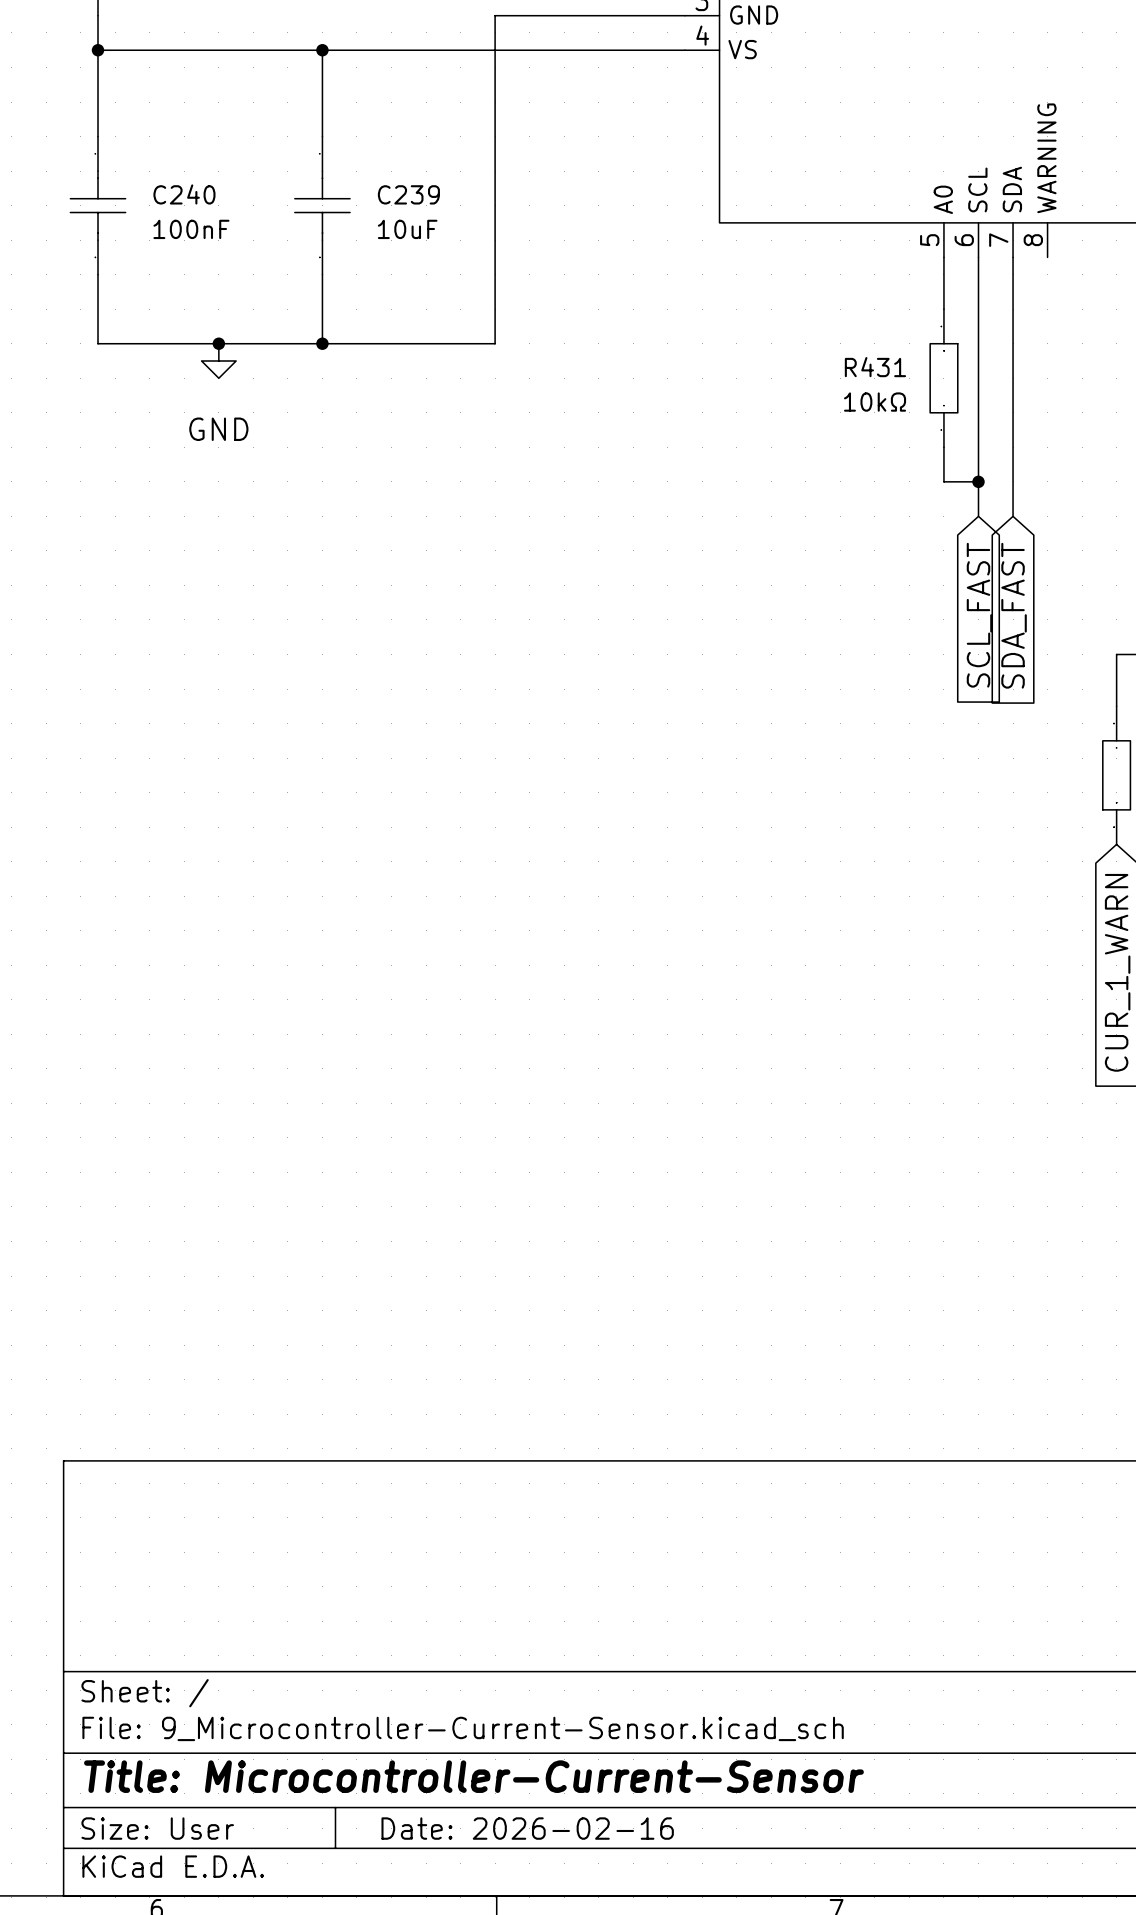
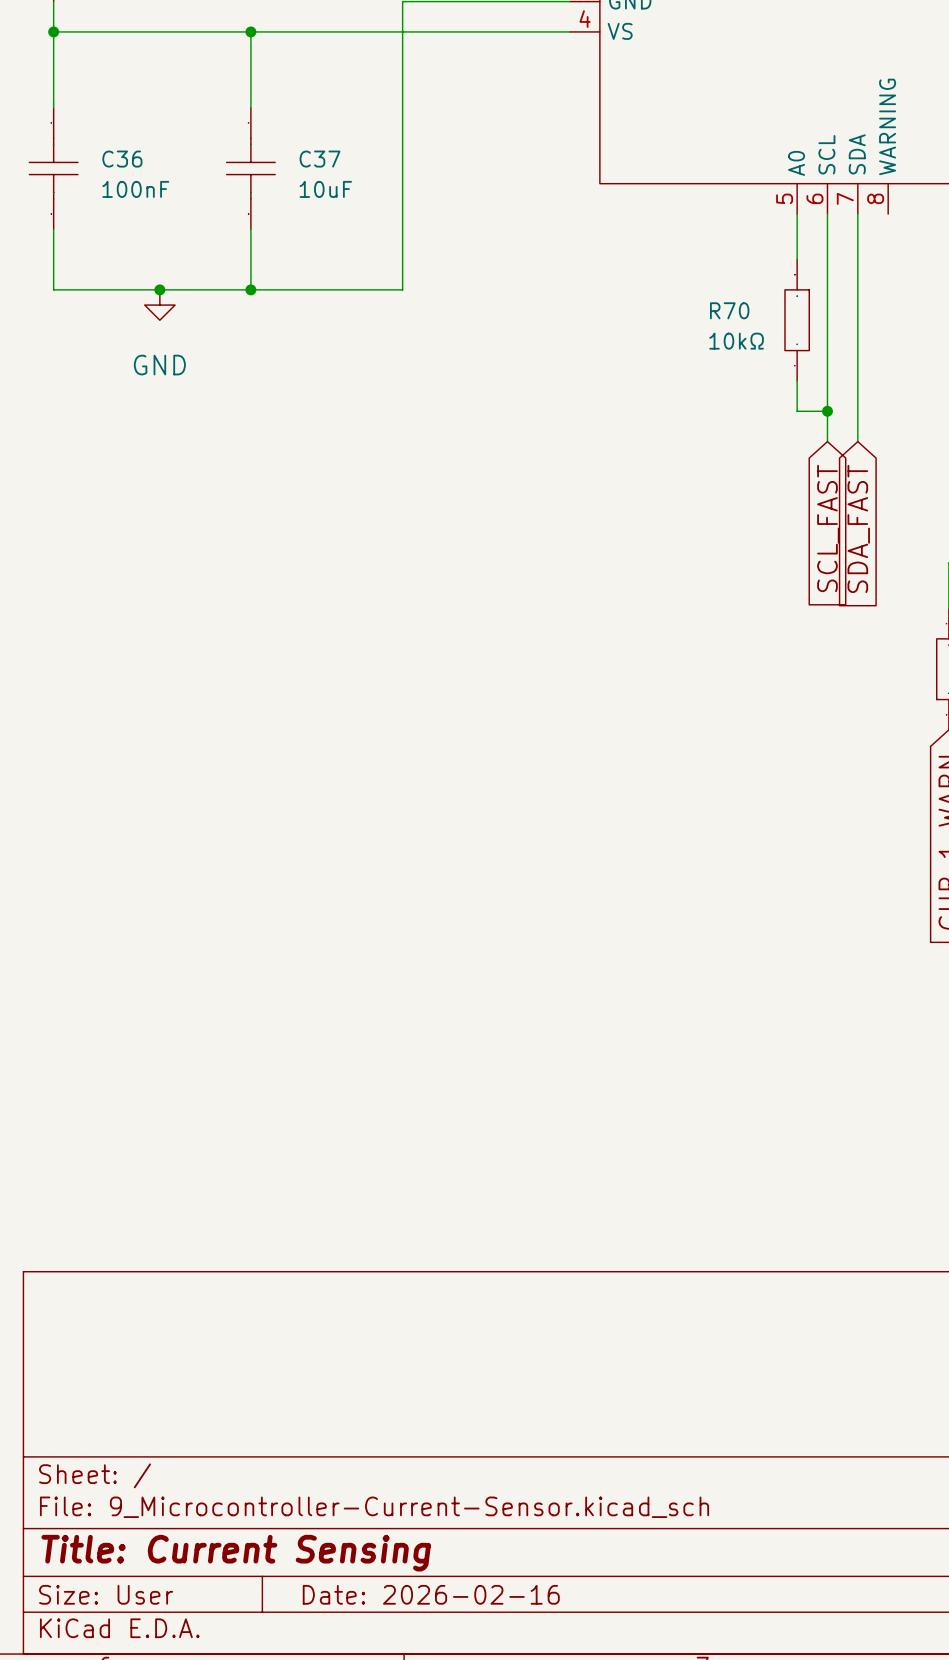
C240 name: C240 (184, 194) -> C36 (122, 159)
C239 name: C239 (408, 194) -> C37 (320, 159)
R431 name: R431 (875, 367) -> R70 (729, 310)
title block: Title: Microcontroller-Current-Sensor (473, 1776) -> Title: Current Sensing (236, 1553)

